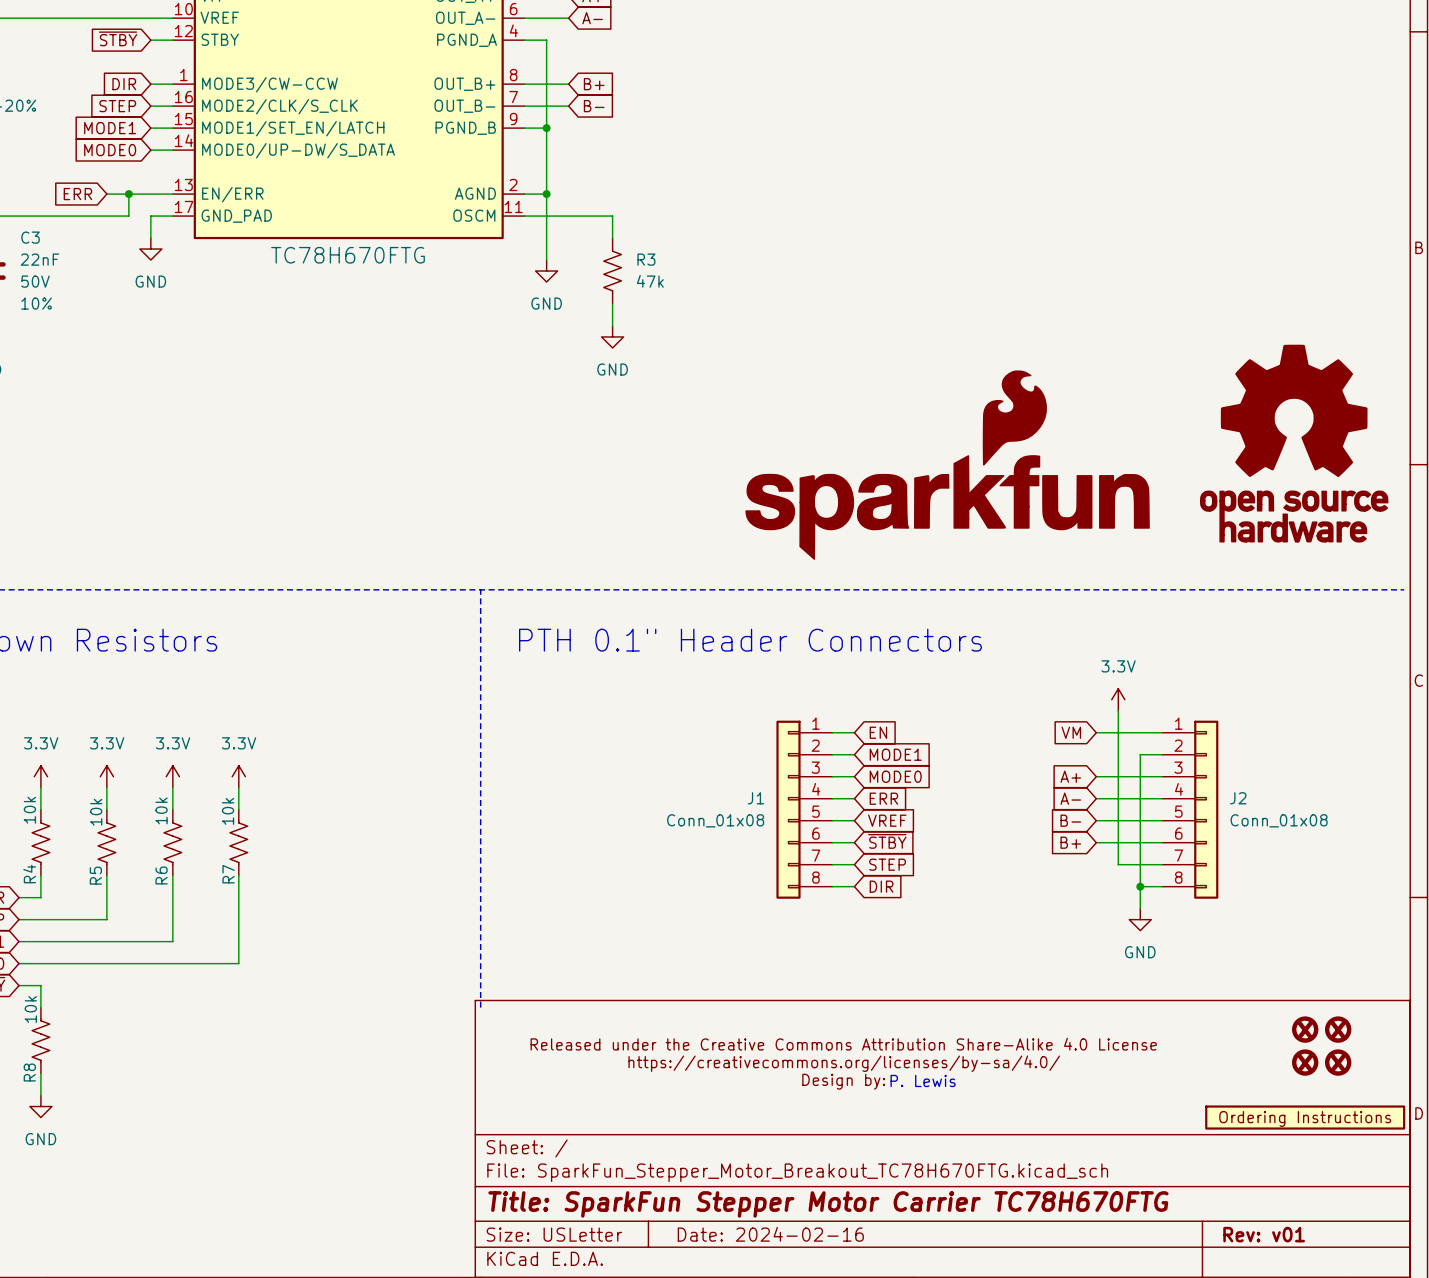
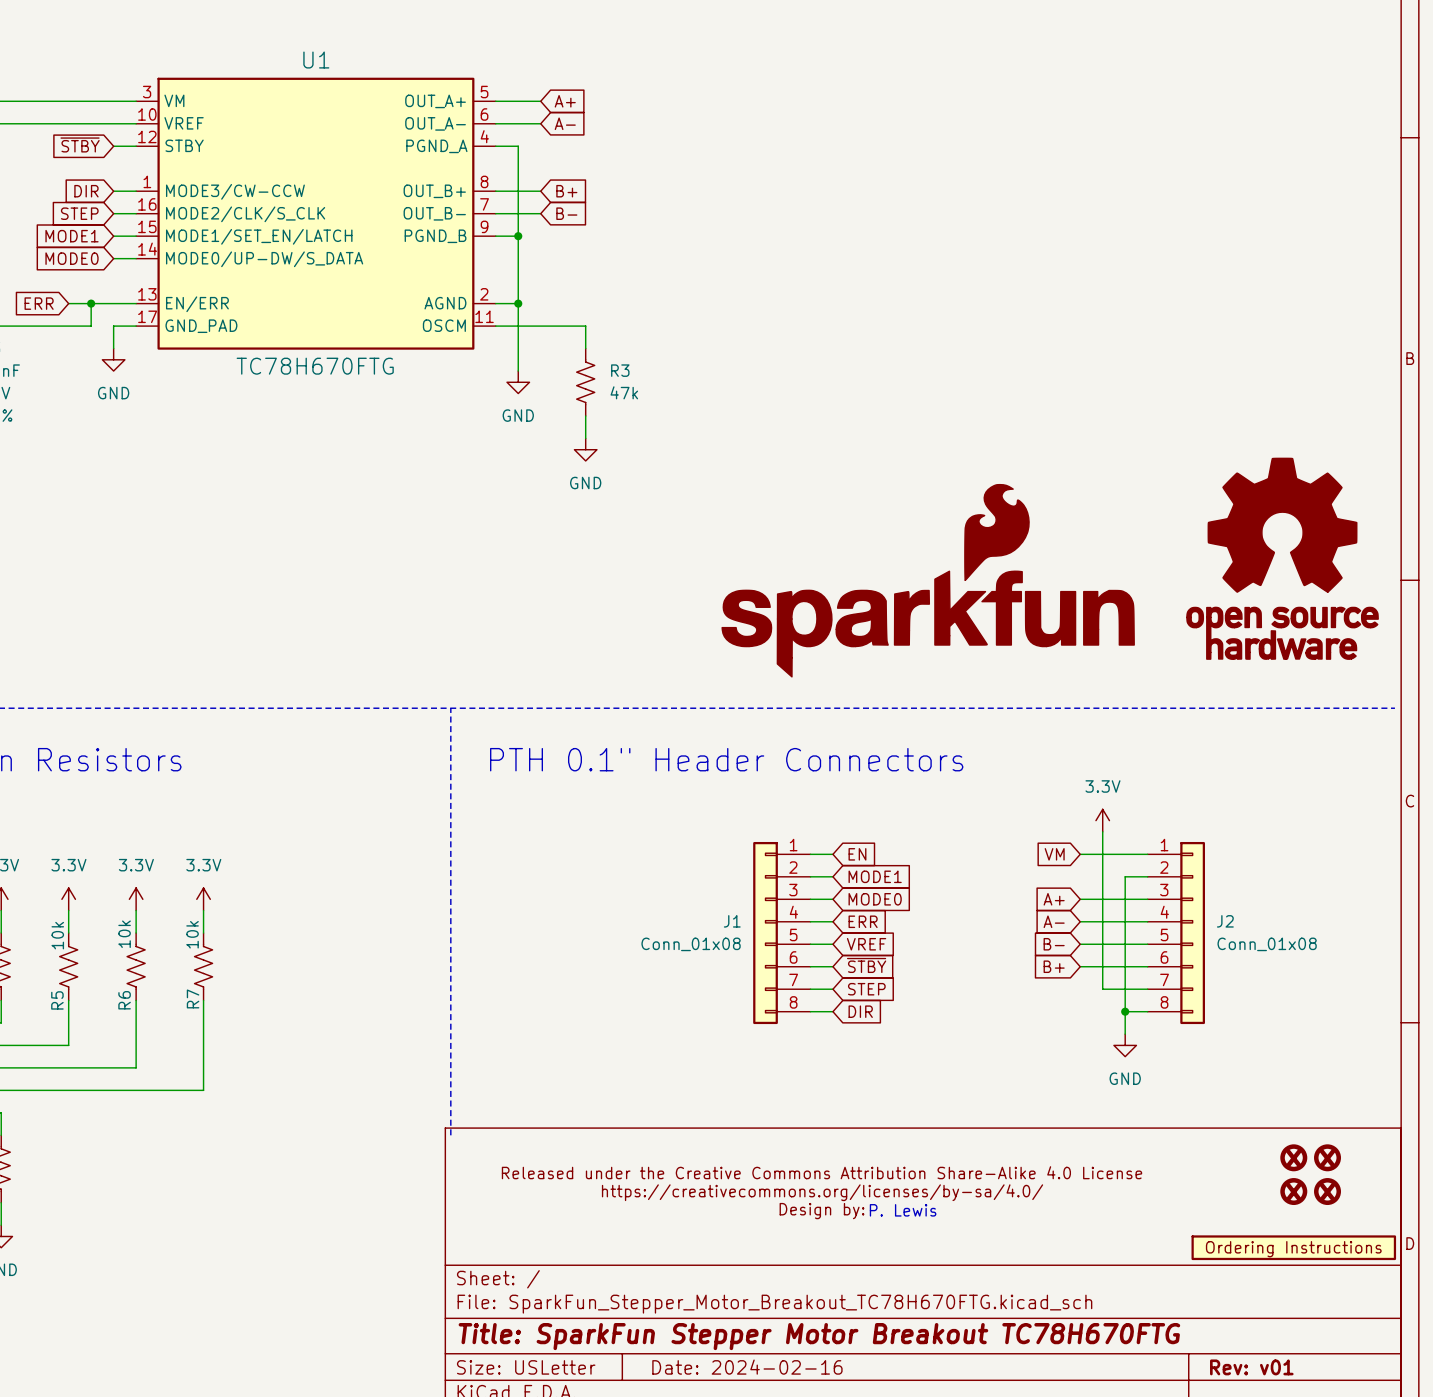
title block: Title: SparkFun Stepper Motor Carrier TC78H670FTG (828, 1204) -> Title: SparkFun Stepper Motor Breakout TC78H670FTG (819, 1336)

